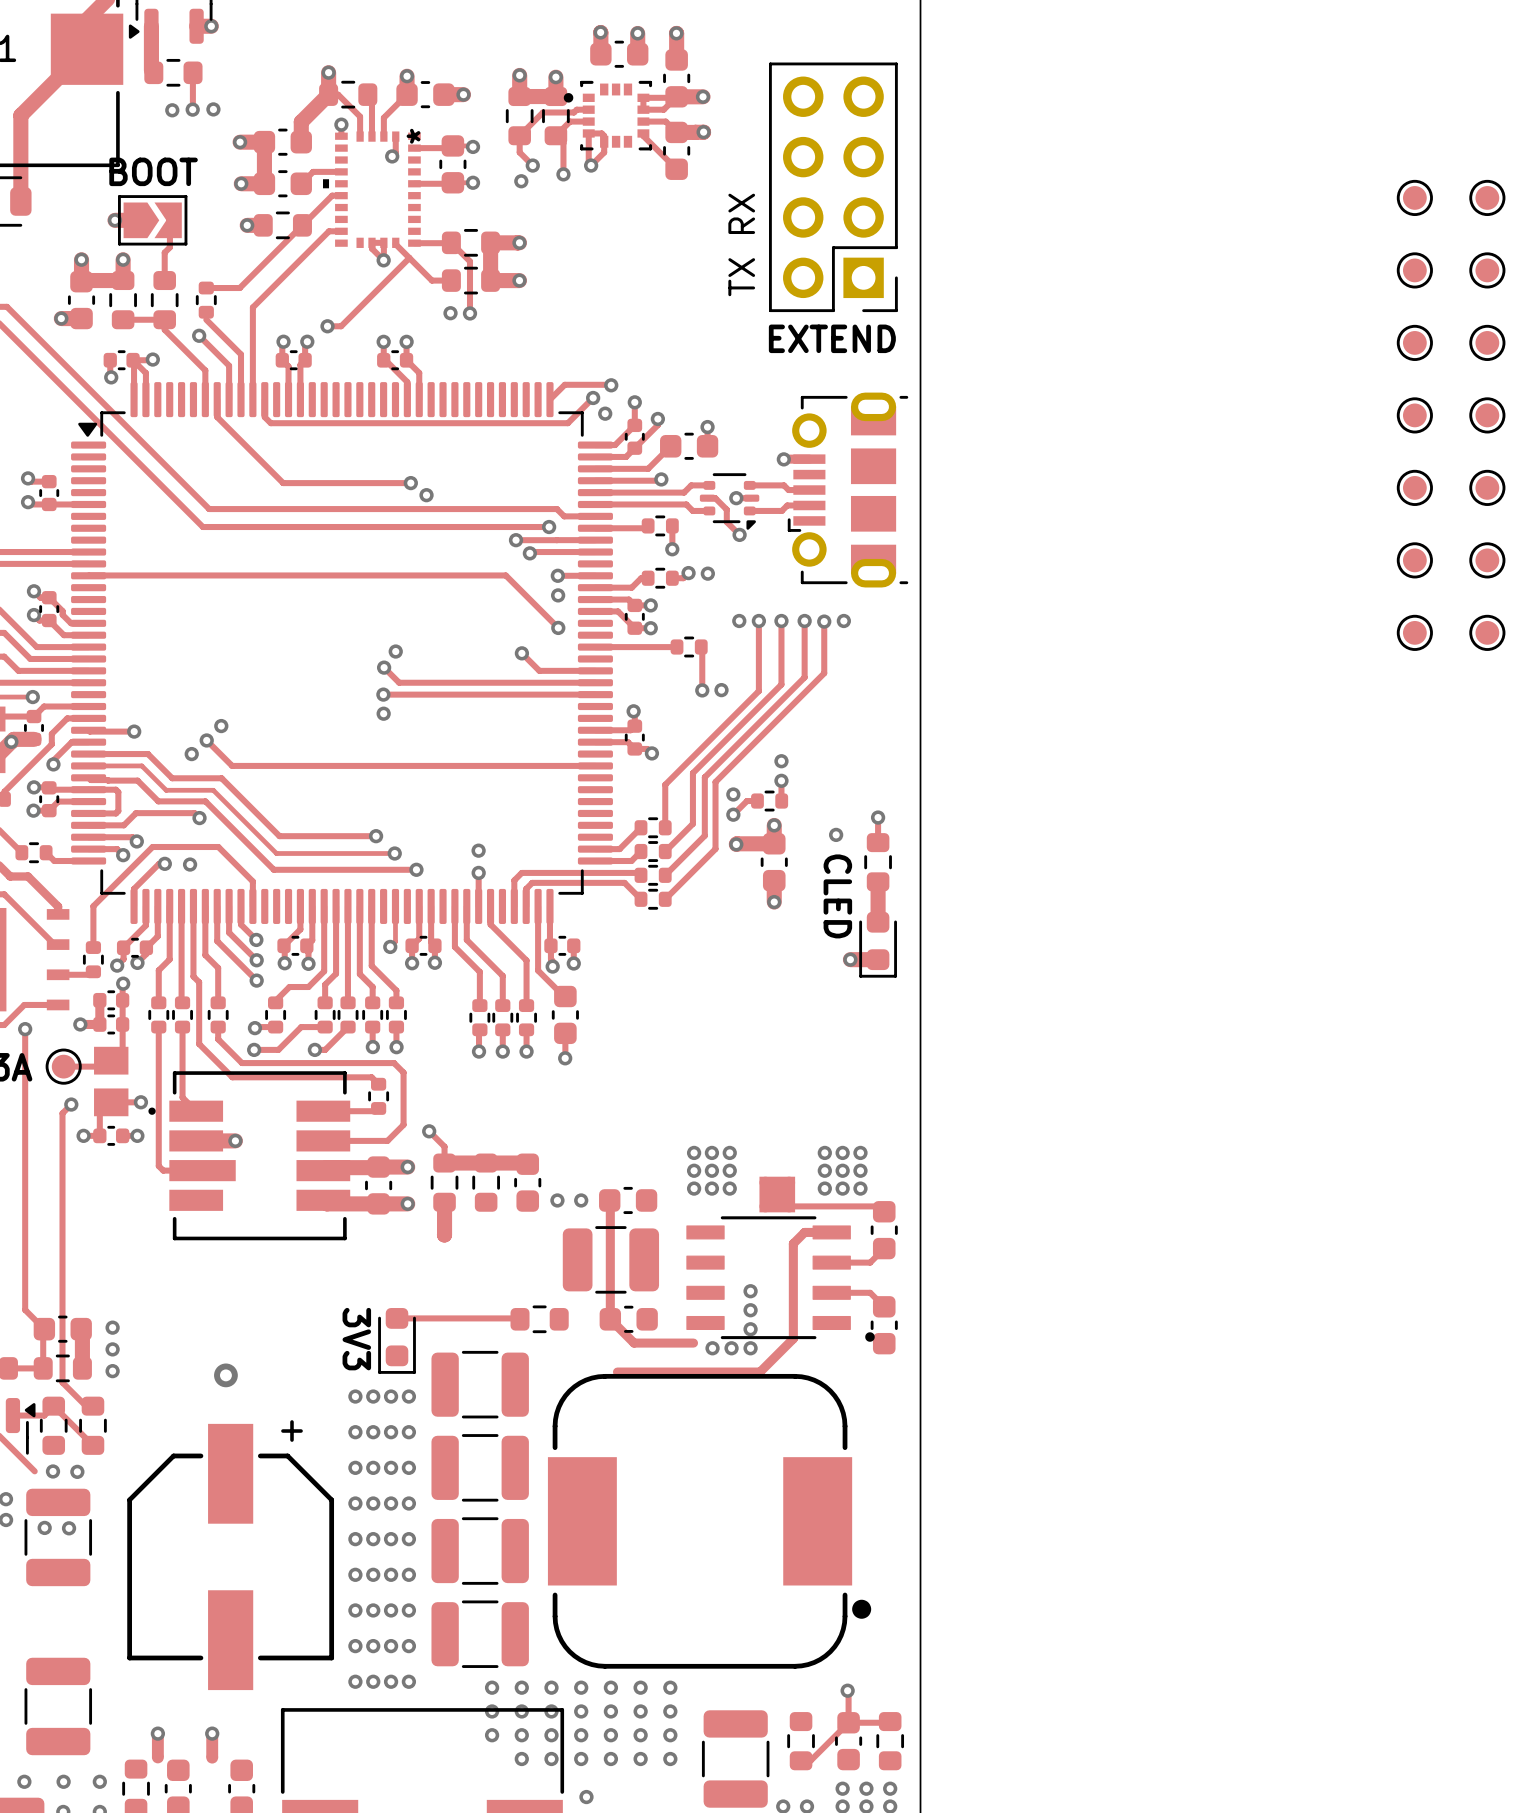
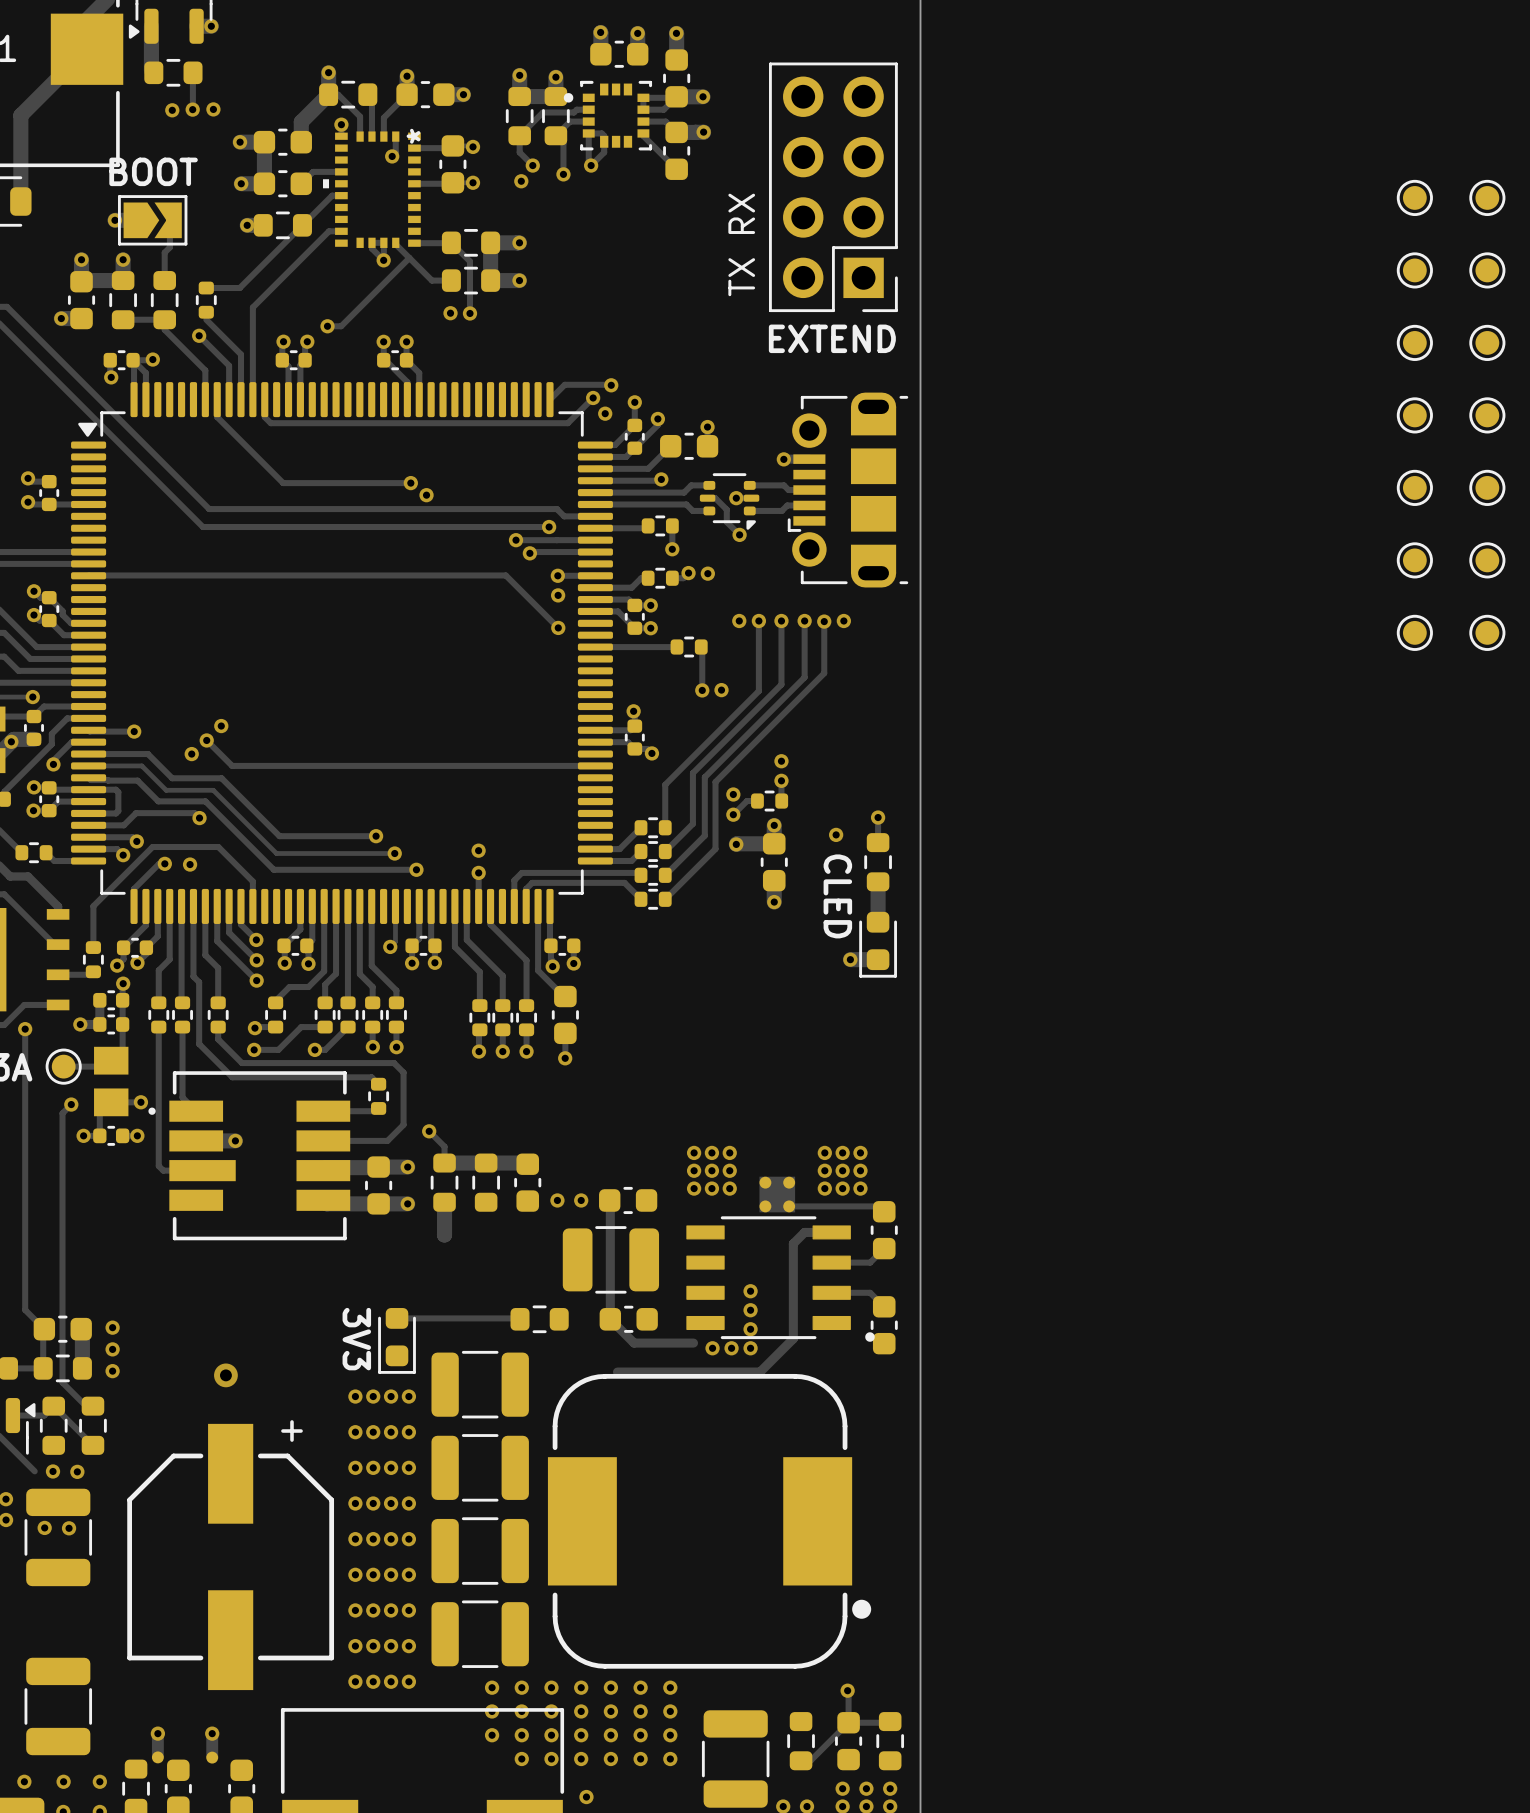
via: (395, 651) -> none
track: (521, 653) (539, 670) (595, 670) -> none
via: (521, 653) -> none
track: (384, 667) (399, 682) (595, 682) -> none
via: (384, 667) -> none
track: (383, 694) (595, 694) -> none
via: (383, 694) -> none
via: (383, 713) -> none

